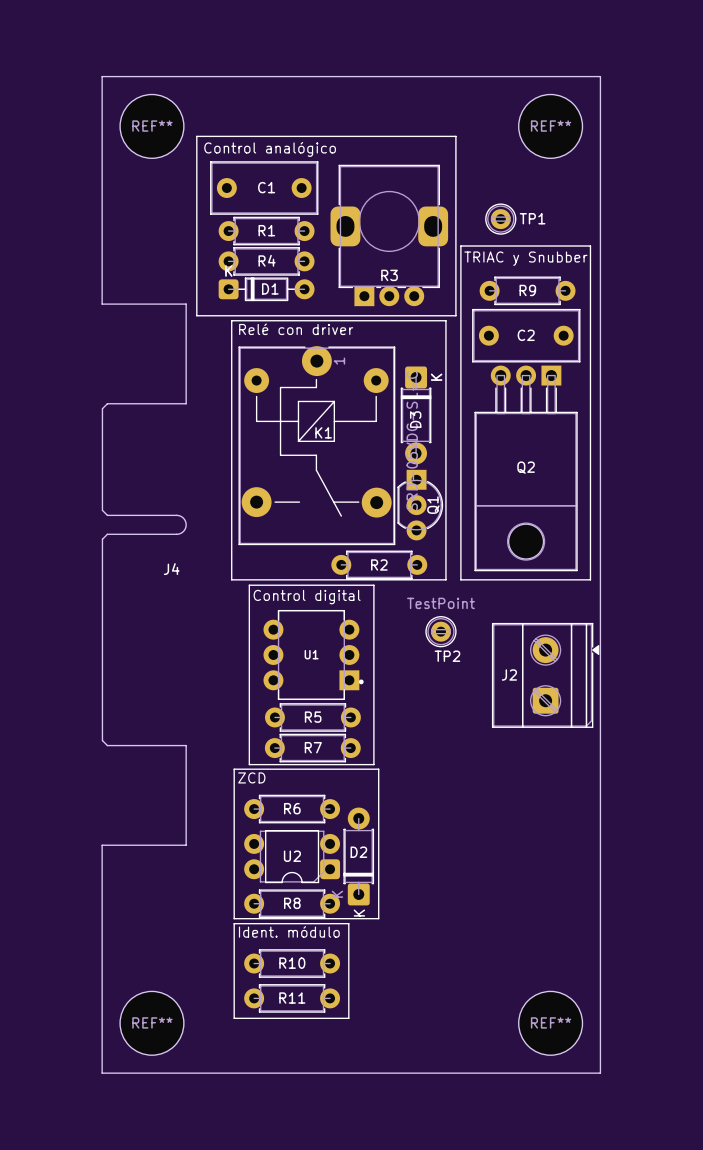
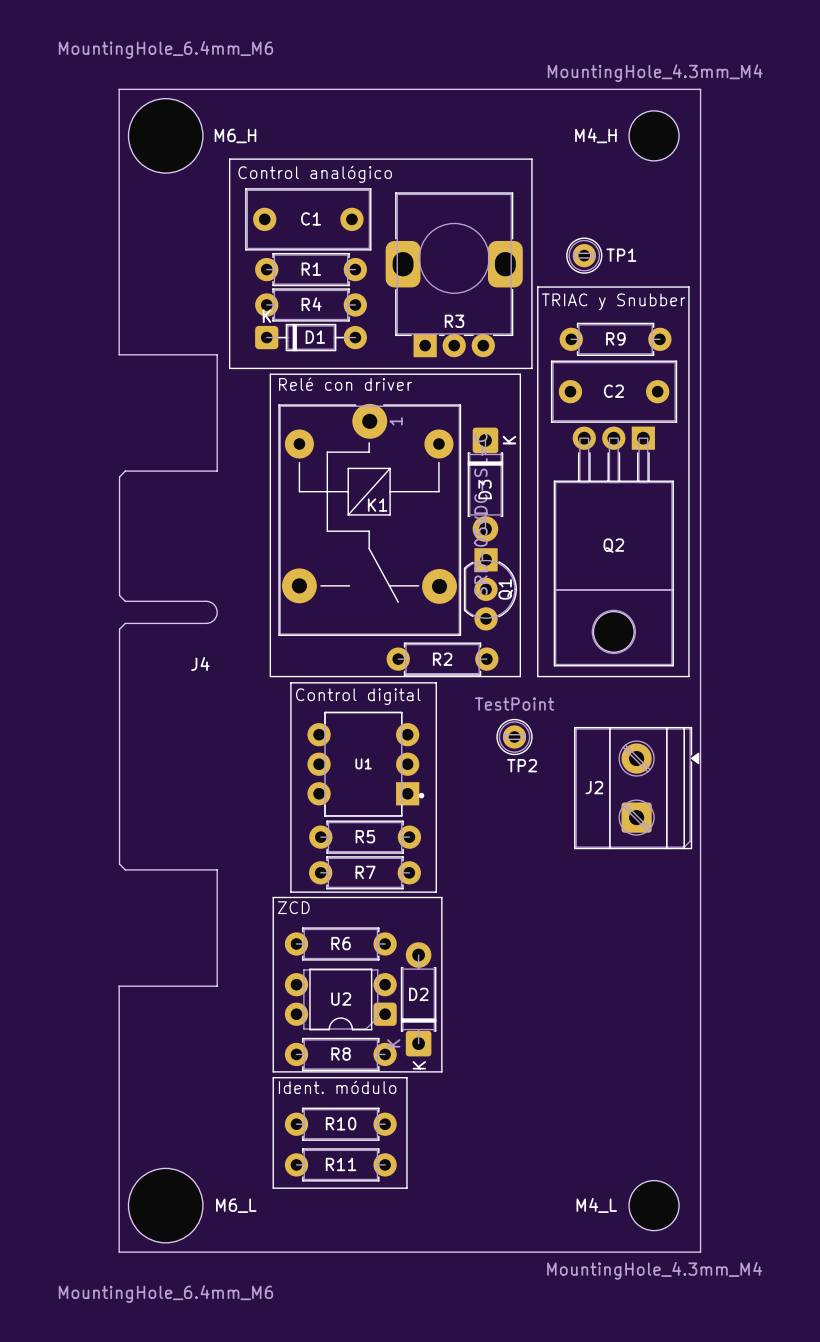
M6_H: none -> MountingHole_6.4mm_M6 (165, 135)
M4_H: none -> MountingHole_4.3mm_M4 (654, 135)
REF**: (151, 126) -> none
REF**: (550, 126) -> none
REF**: (151, 1023) -> none
REF**: (550, 1023) -> none
M6_L: none -> MountingHole_6.4mm_M6 (165, 1205)
M4_L: none -> MountingHole_4.3mm_M4 (654, 1205)

